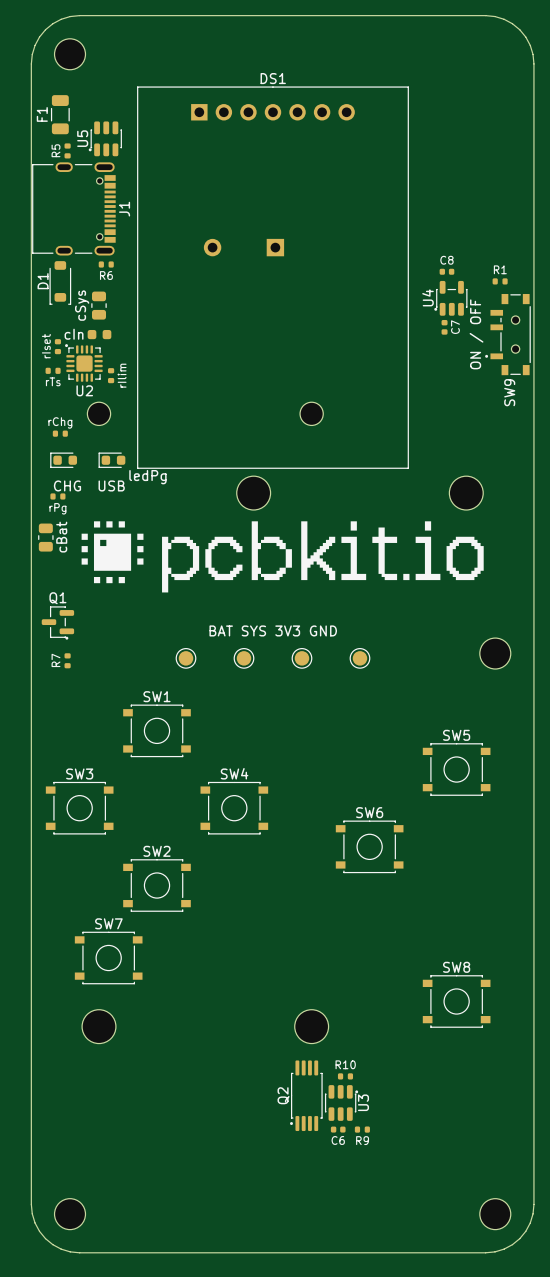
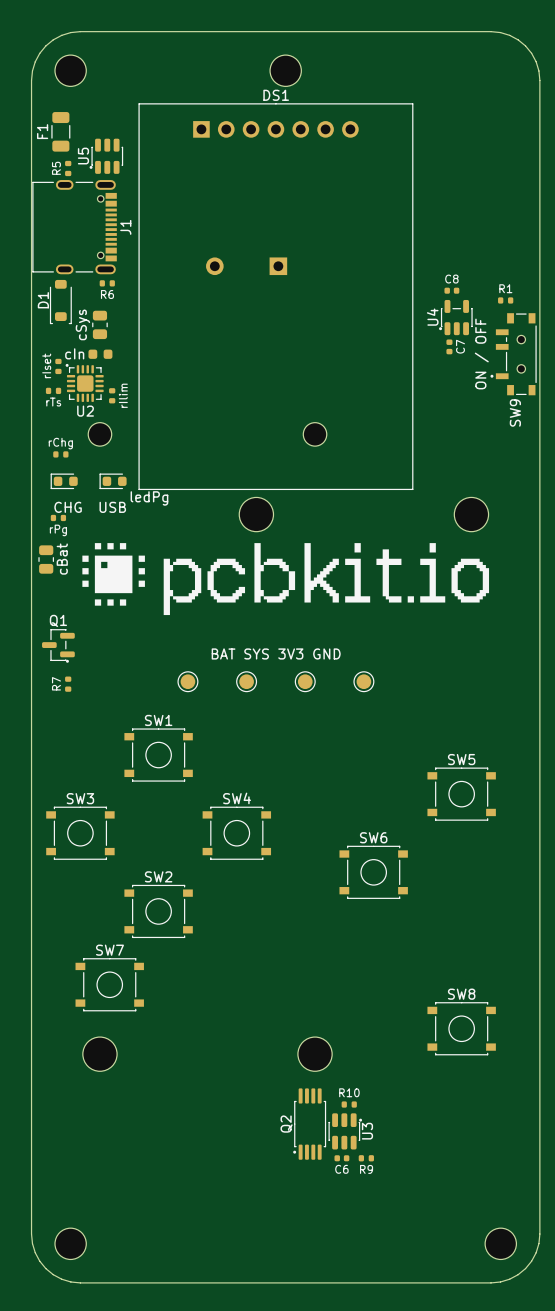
part: none -> (285, 70)
part: (495, 653) -> none

